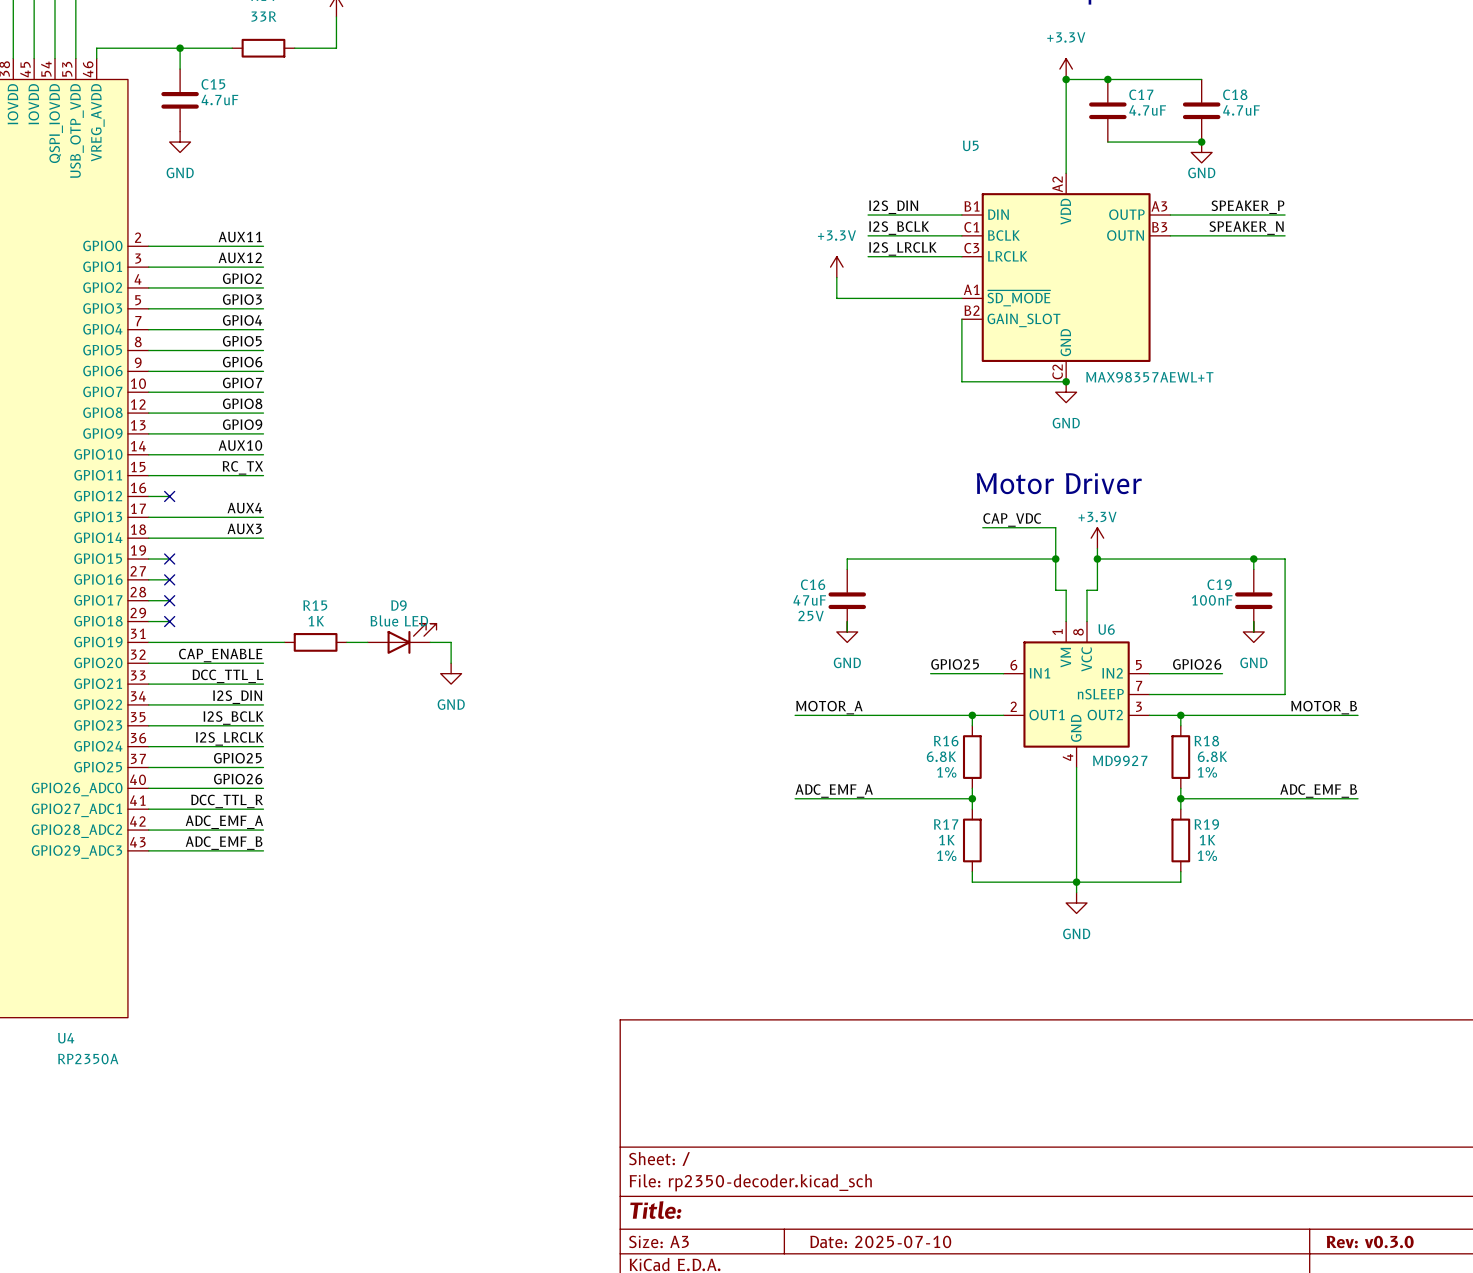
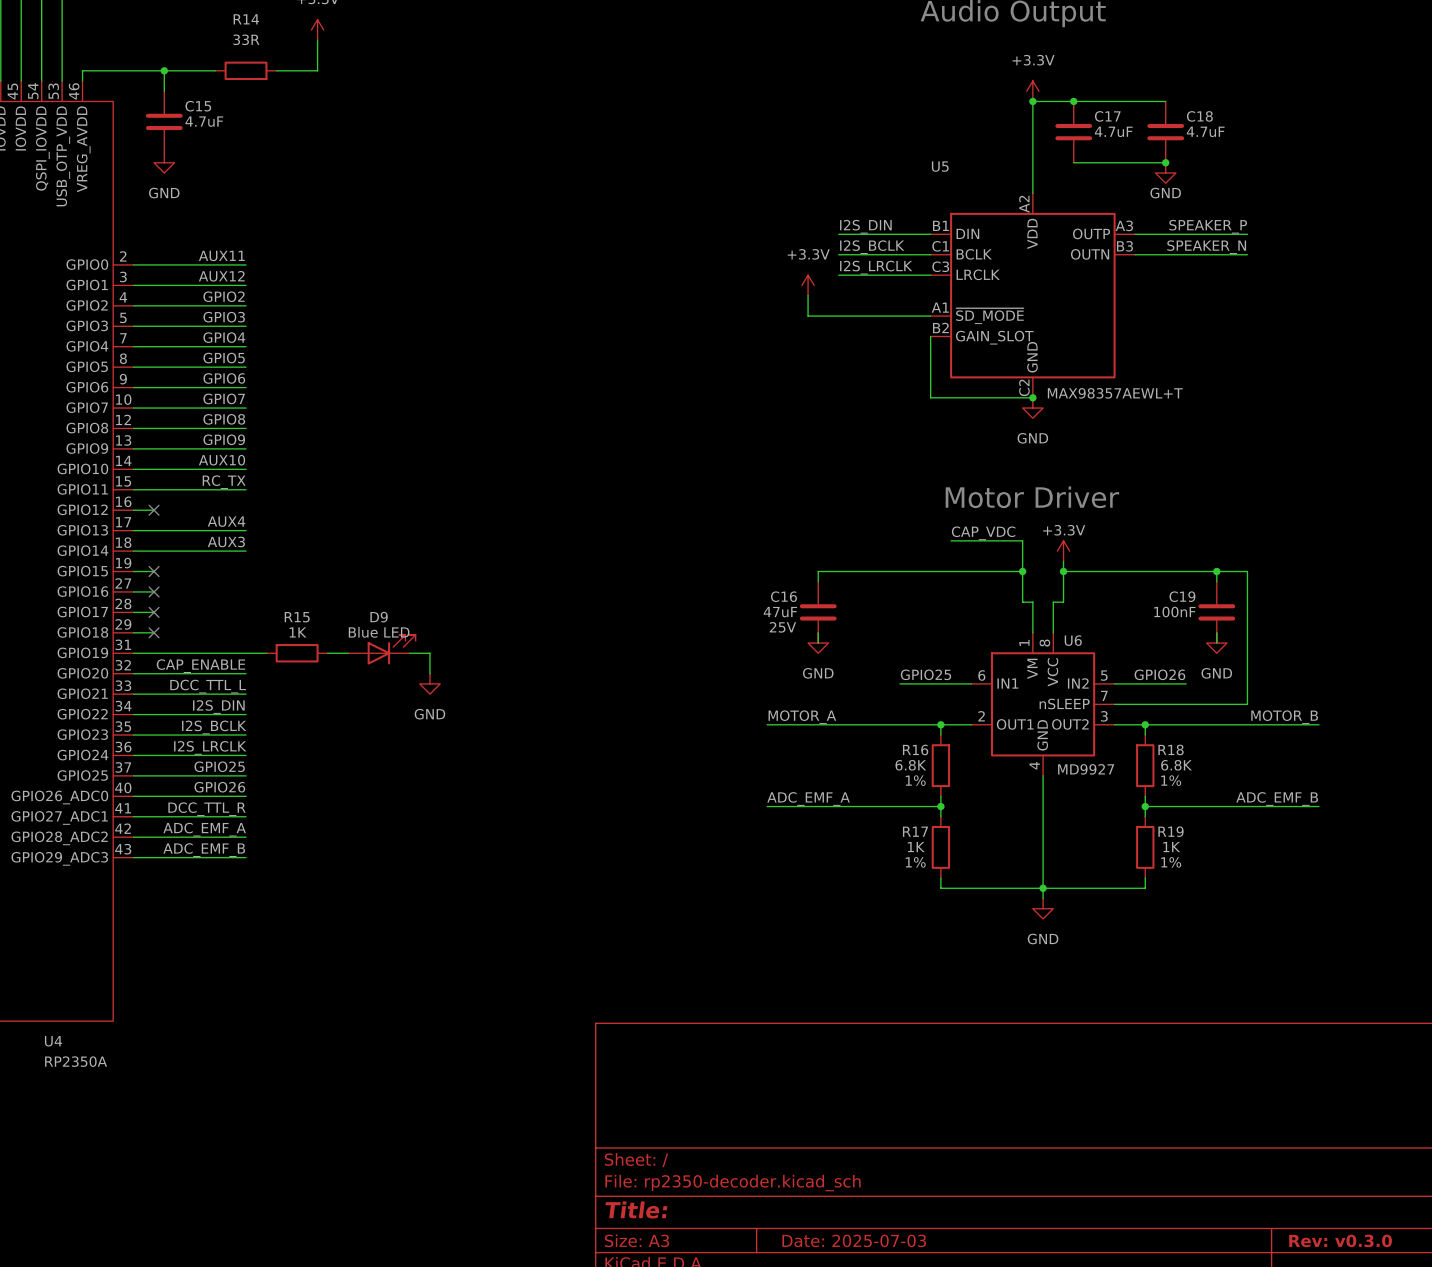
title block: Date: 2025-07-10 (880, 1241) -> Date: 2025-07-03 (854, 1240)

